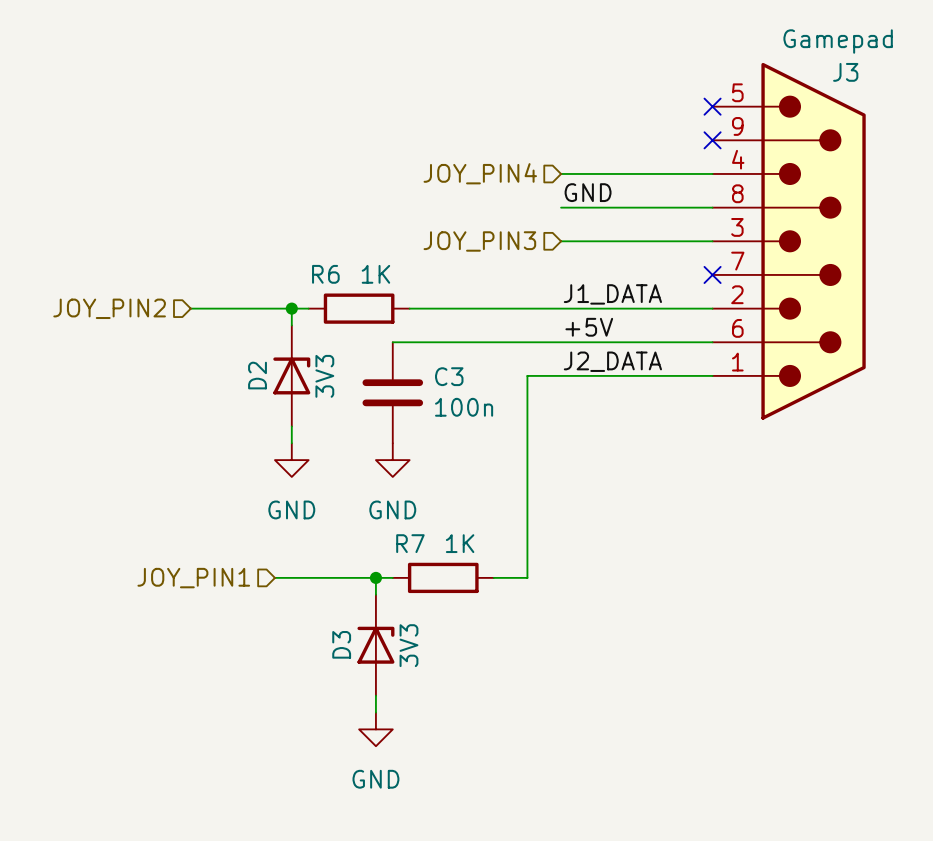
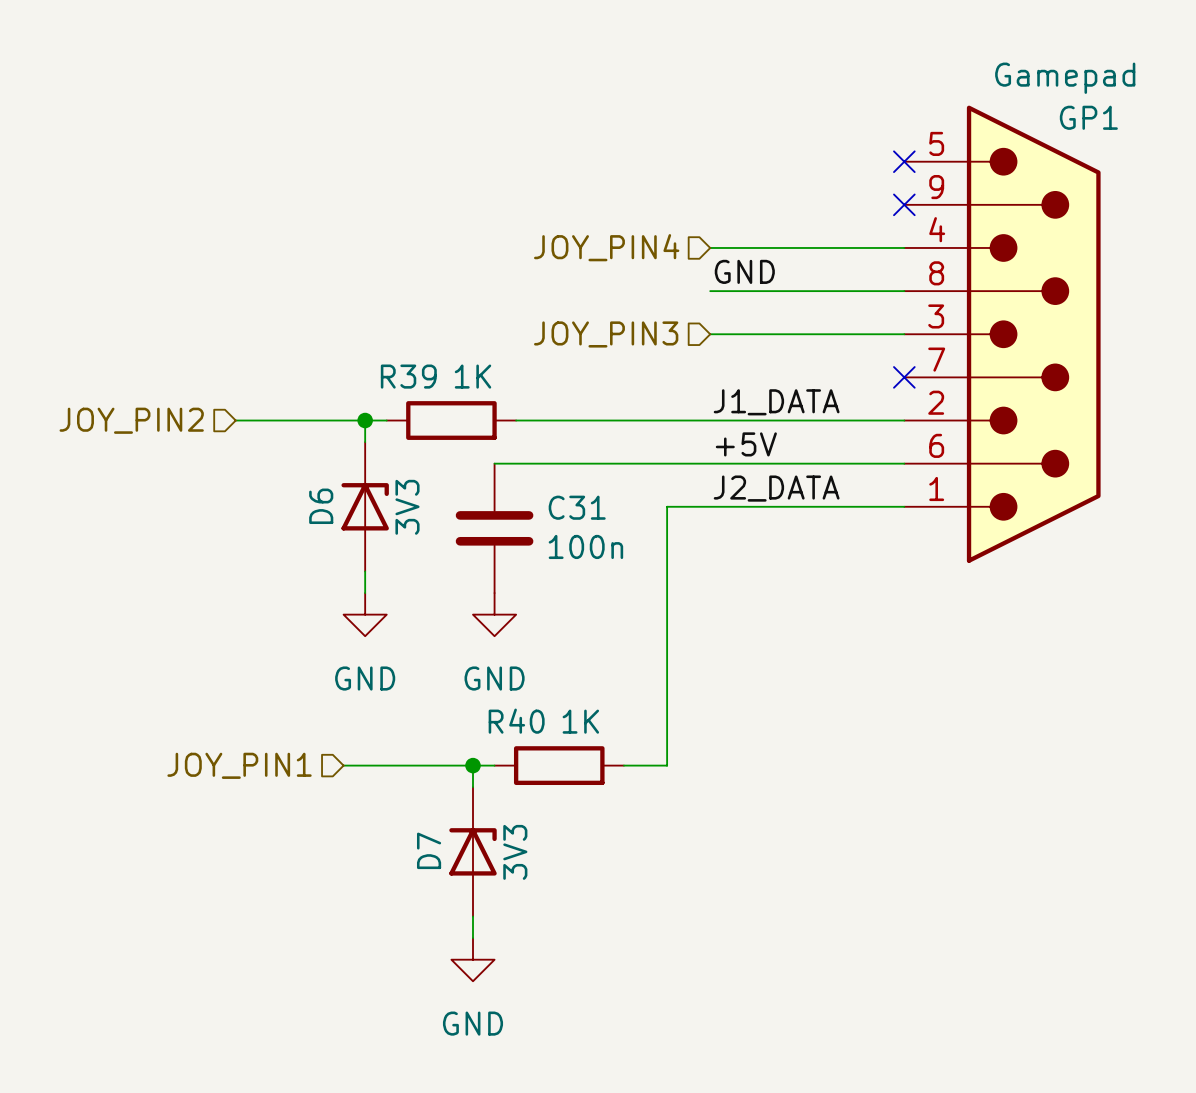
J3 name: J3 (845, 72) -> GP1 (1088, 117)
R6 name: R6 (325, 274) -> R39 (408, 376)
D2 name: D2 (257, 375) -> D6 (321, 506)
C3 name: C3 (449, 376) -> C31 (577, 507)
R7 name: R7 (410, 543) -> R40 (516, 721)
D3 name: D3 (341, 644) -> D7 (429, 850)

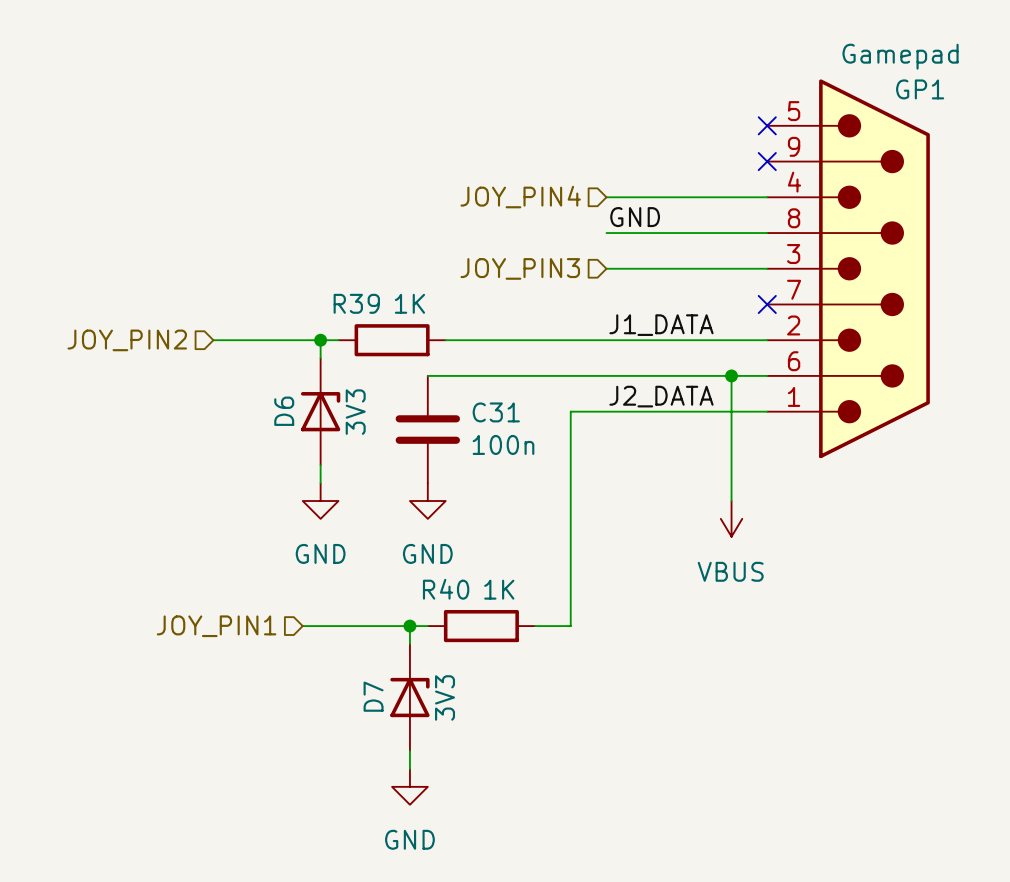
label: +5V (746, 444) -> none
wire: none -> (731, 375) (731, 501)
junction: none -> (731, 375)
power symbol: none -> VBUS (731, 518)

